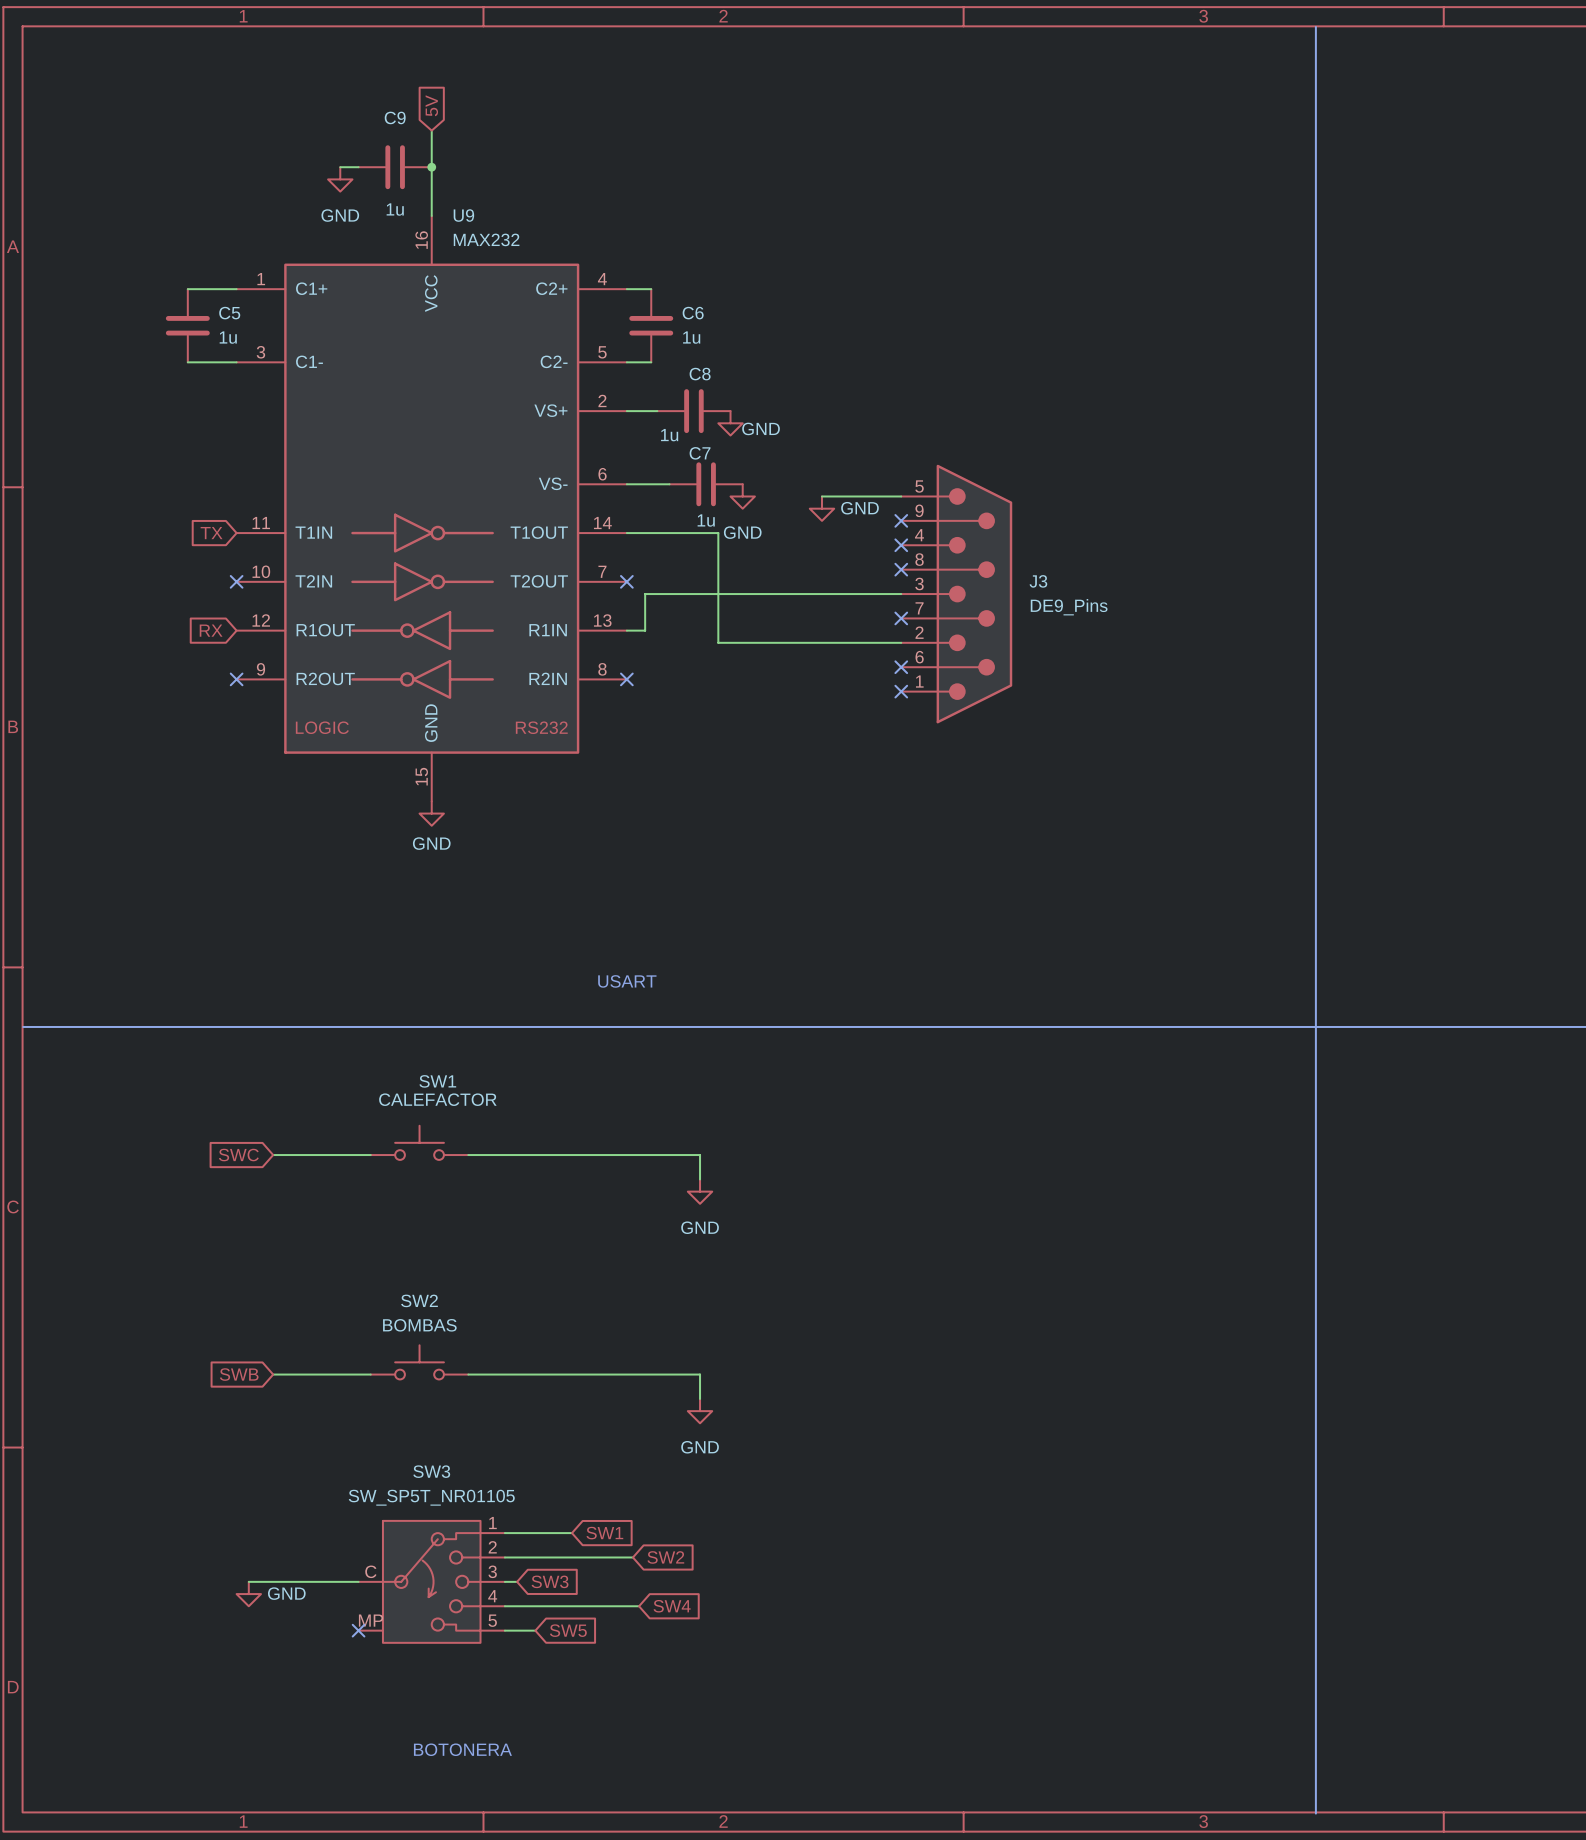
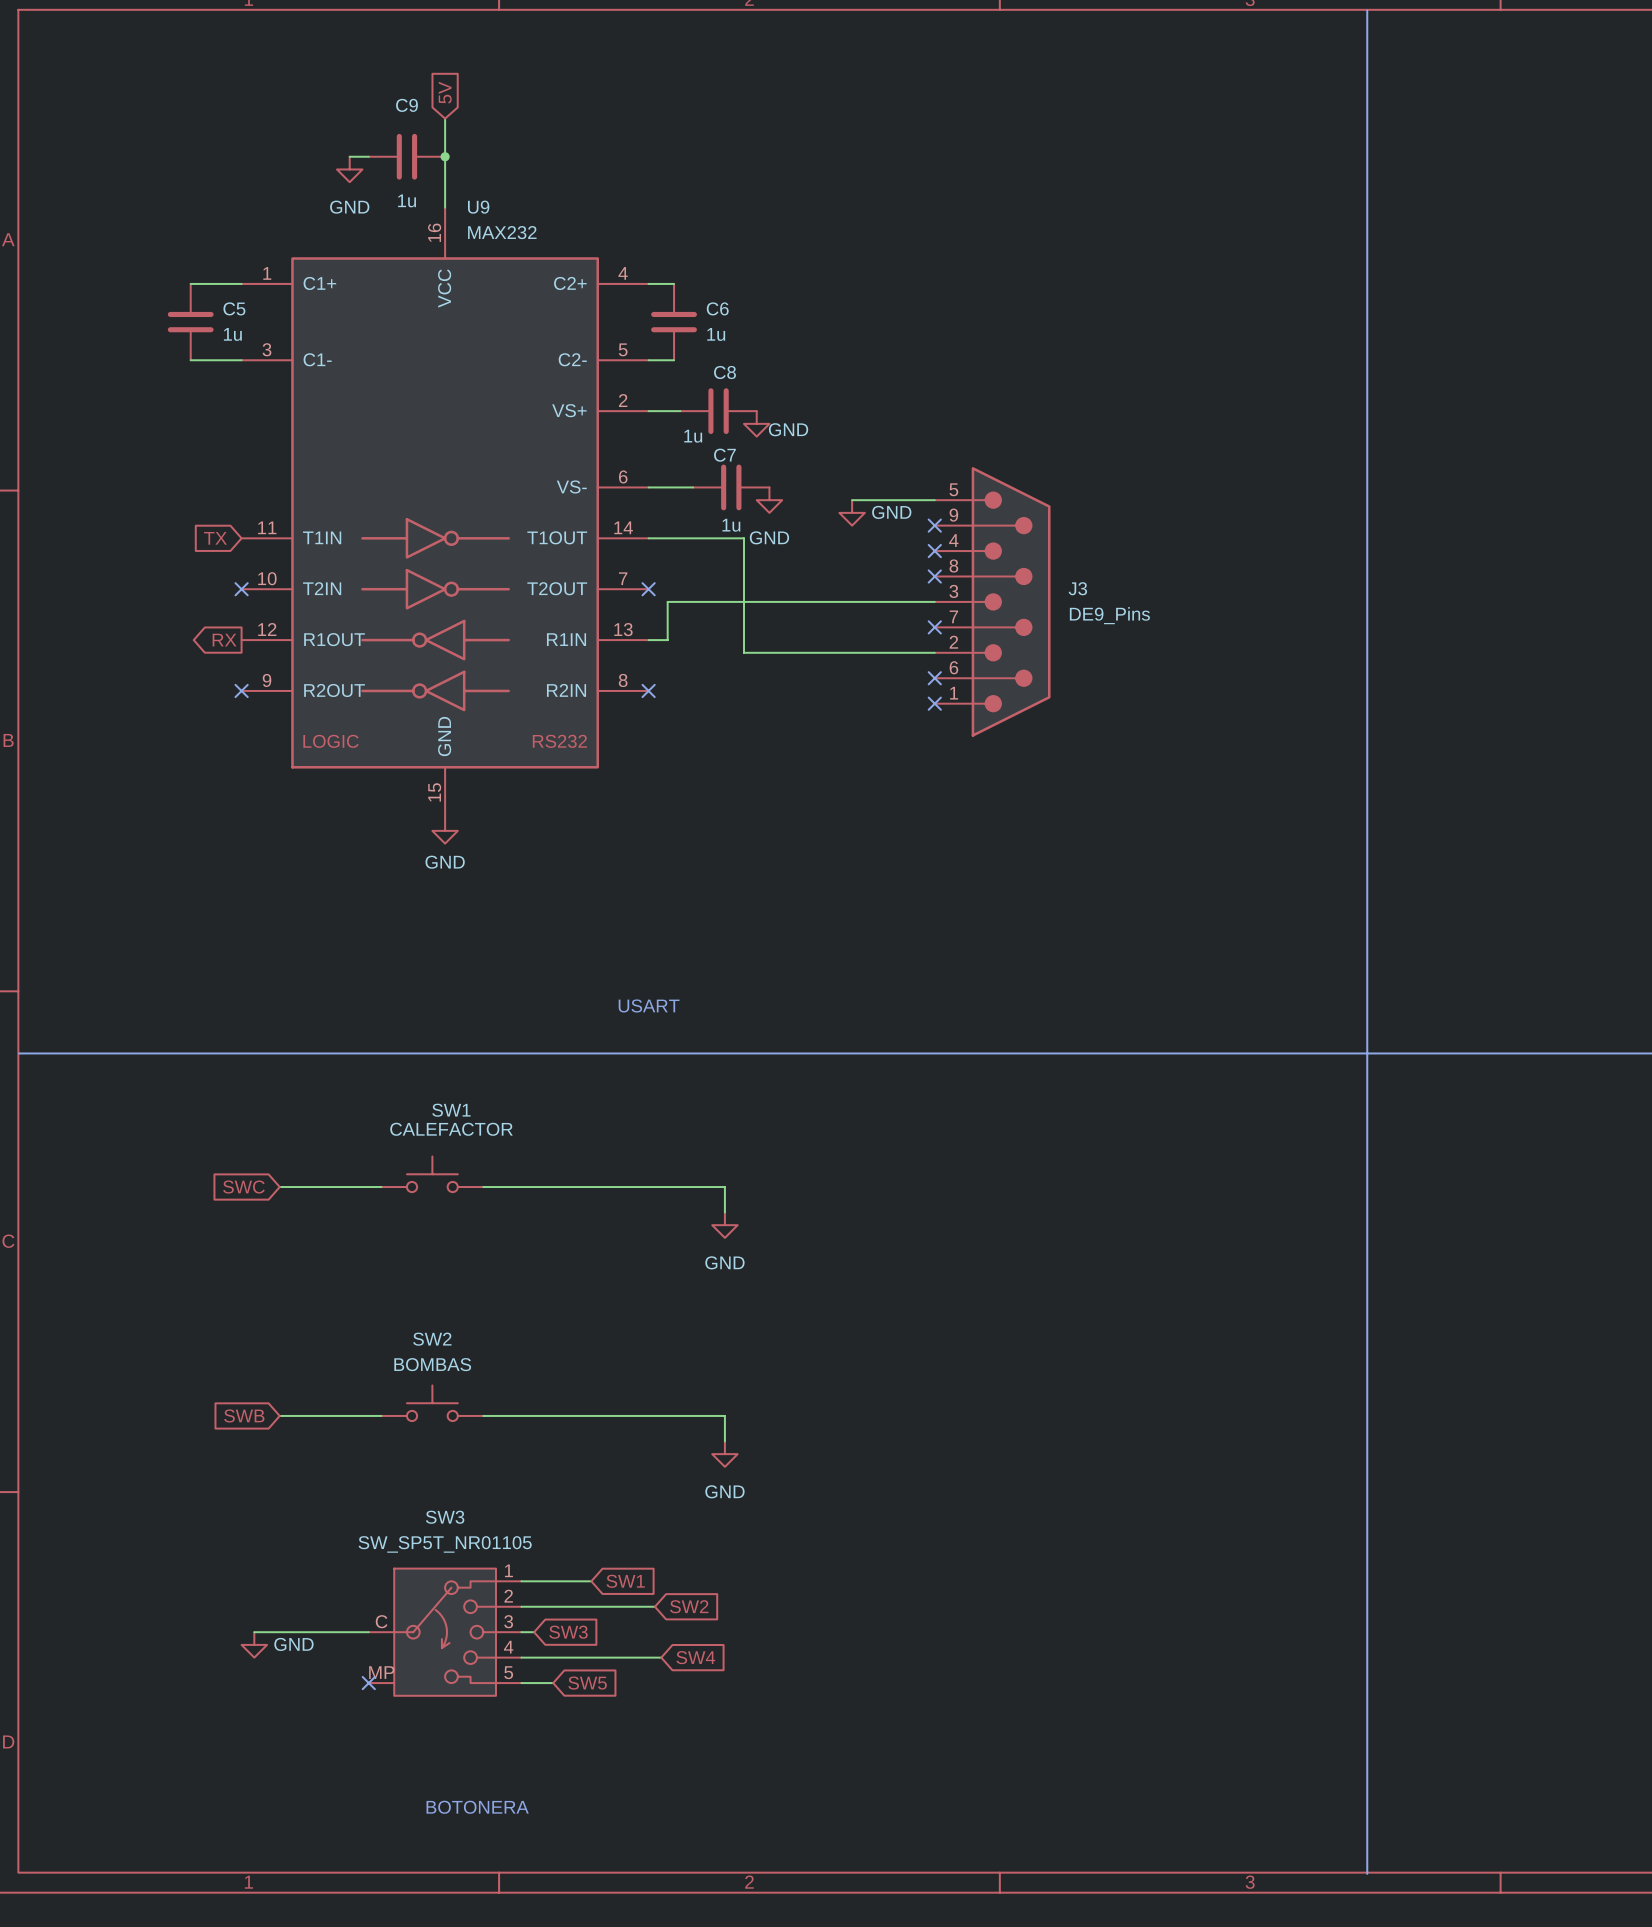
global label shape: input (211, 630) -> output (224, 640)

